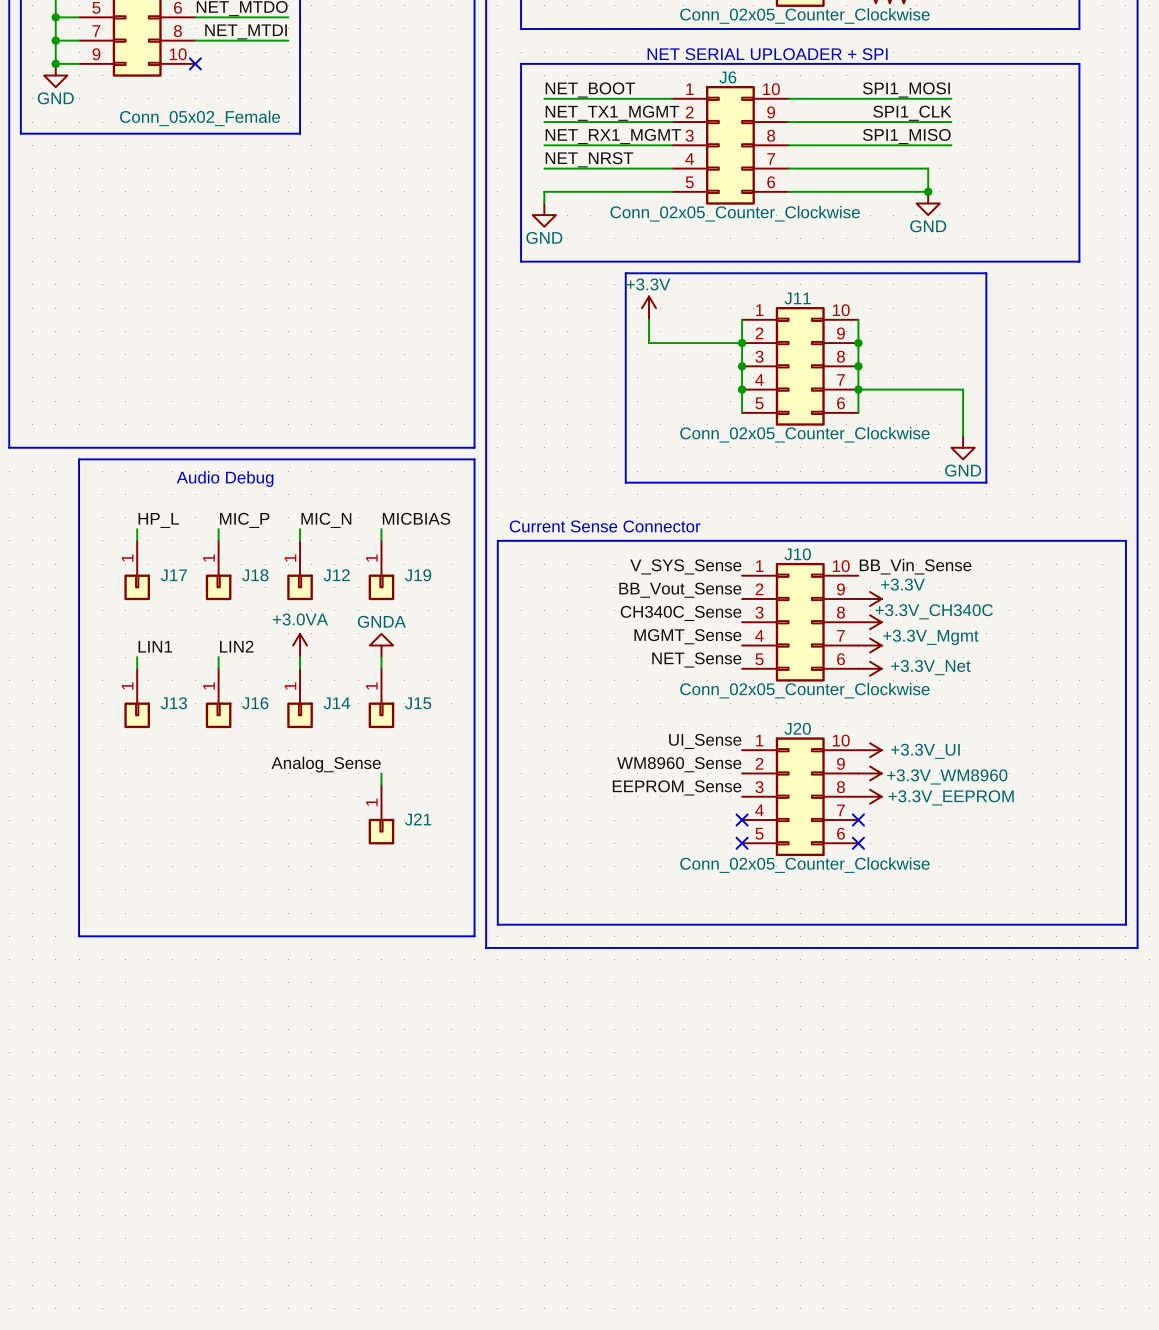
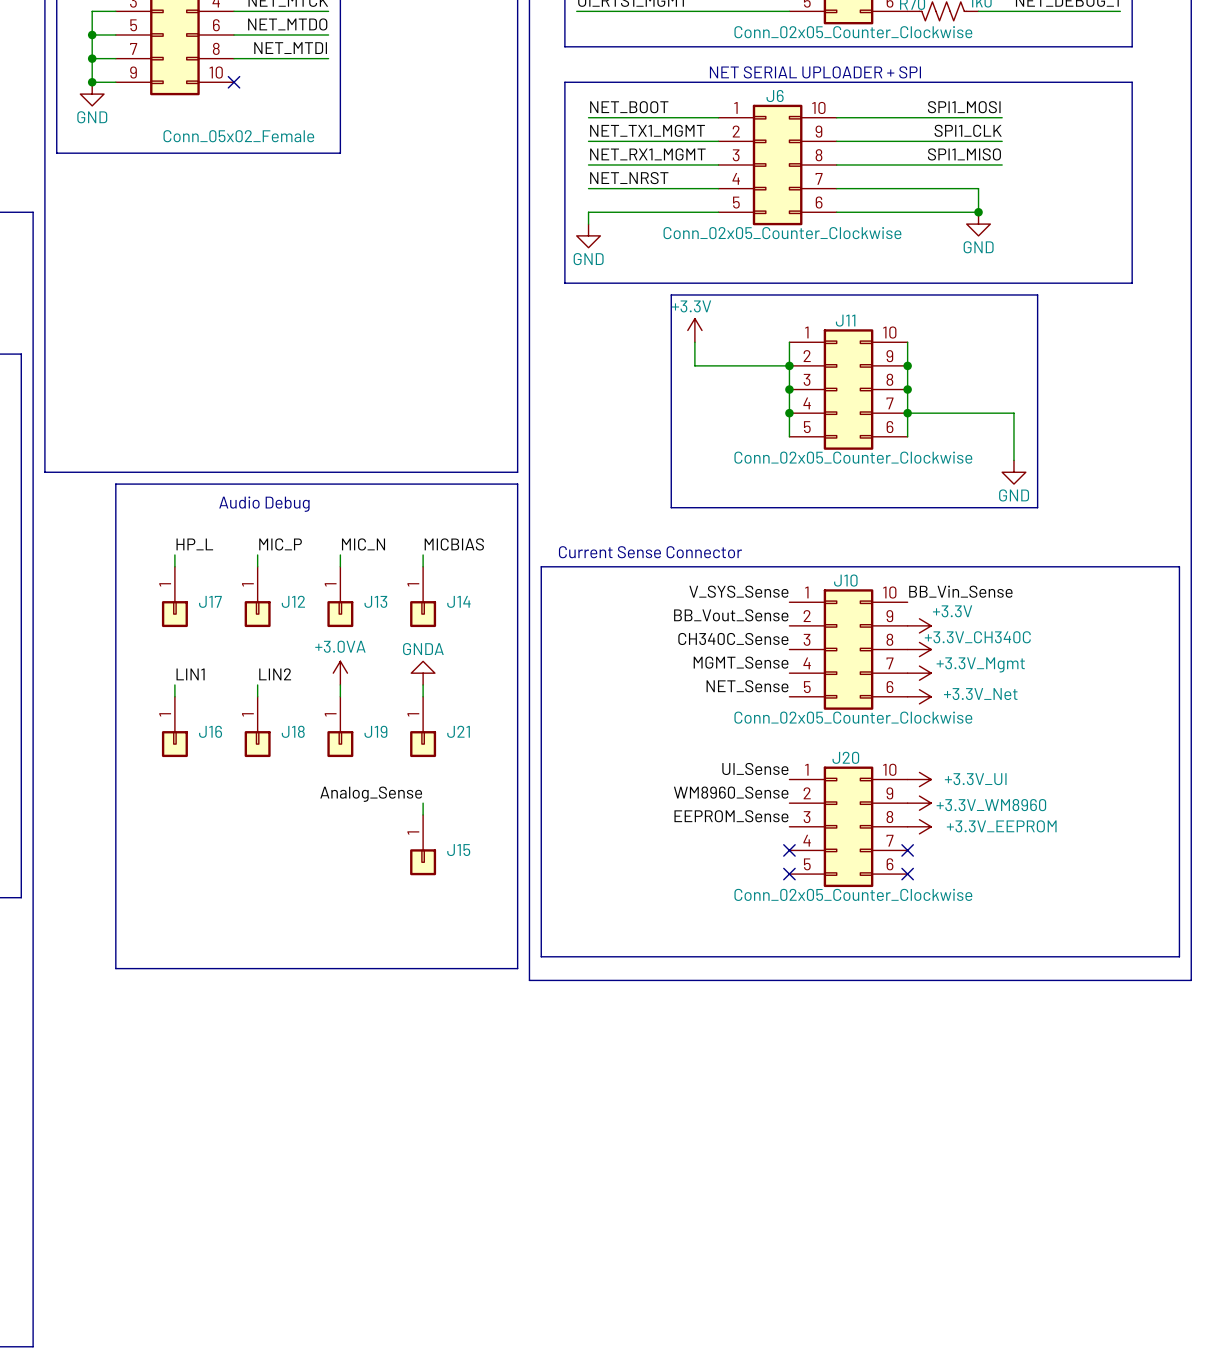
J18 name: J18 (255, 575) -> J12 (293, 601)
J12 name: J12 (336, 575) -> J13 (375, 601)
J19 name: J19 (418, 575) -> J14 (458, 601)
J13 name: J13 (173, 703) -> J16 (210, 731)
J16 name: J16 (255, 703) -> J18 (293, 731)
J14 name: J14 (336, 703) -> J19 (375, 731)
J15 name: J15 (418, 703) -> J21 (458, 731)
J21 name: J21 (418, 819) -> J15 (458, 850)

